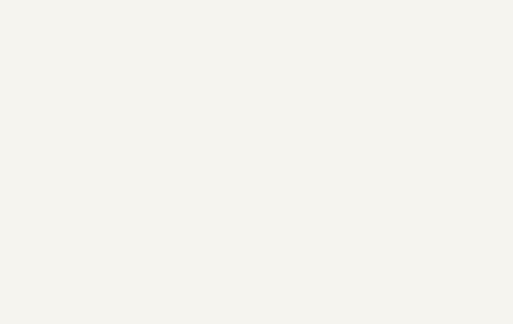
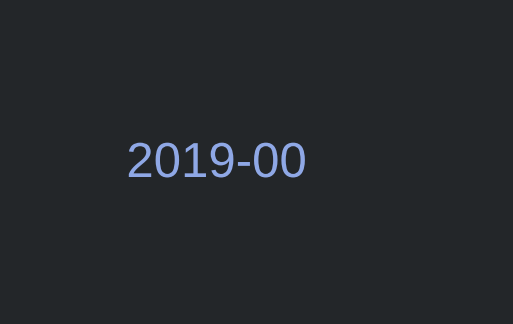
text: none -> 2019-00 (216, 160)

